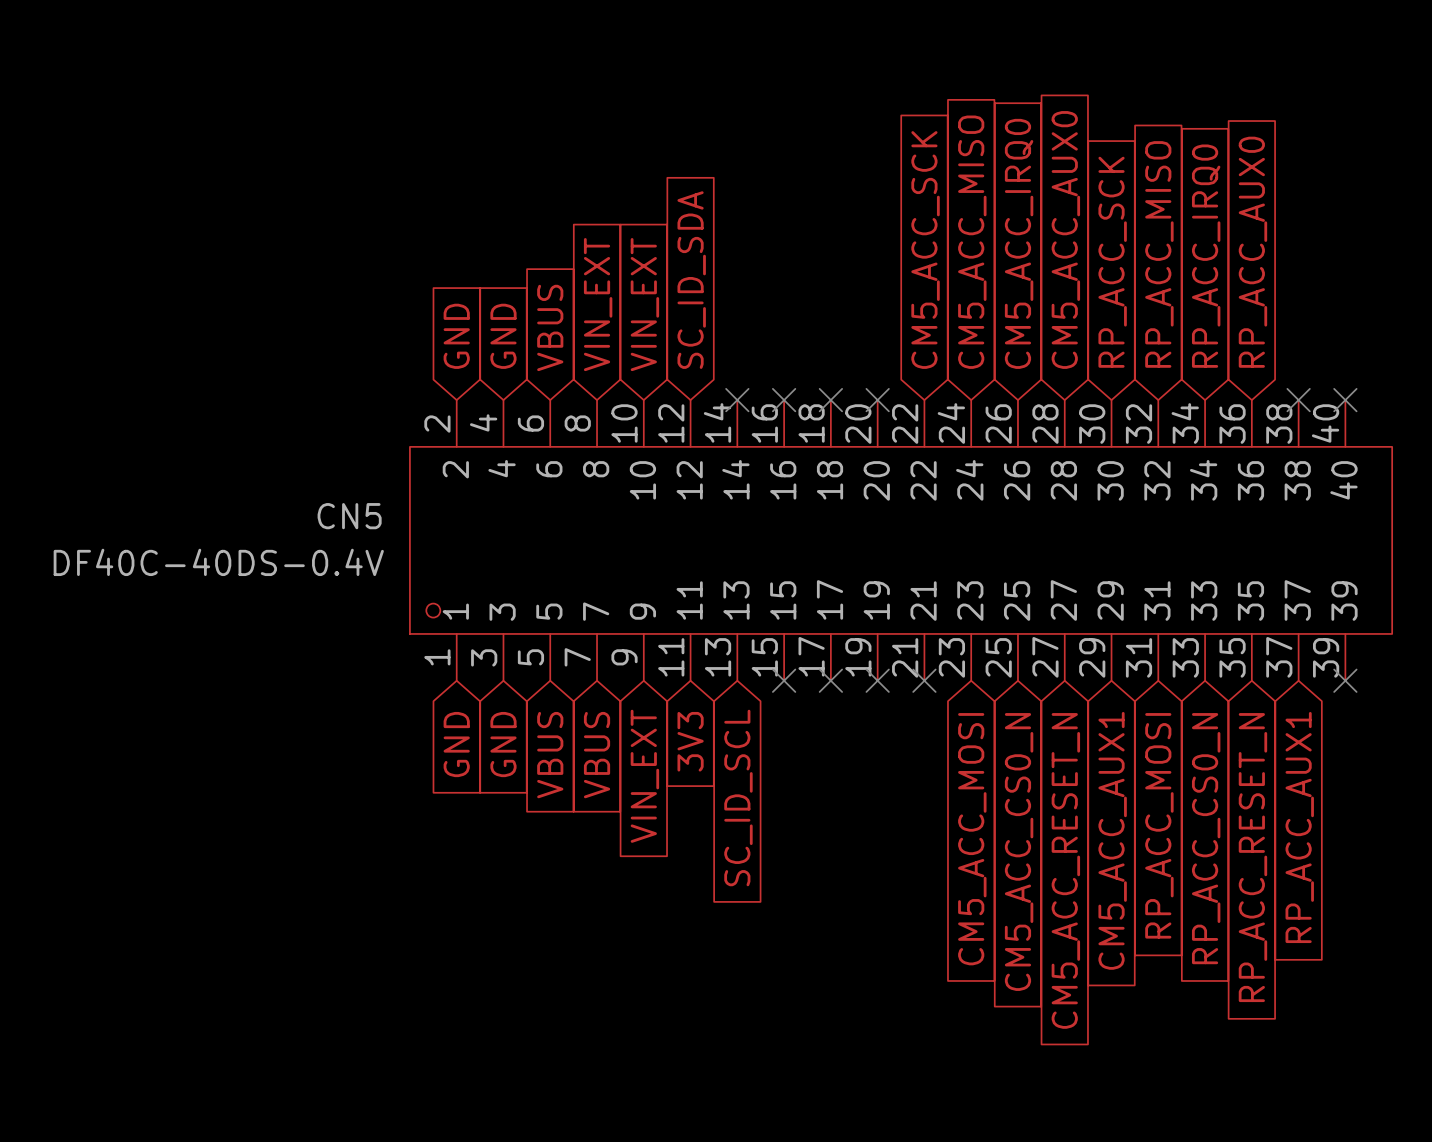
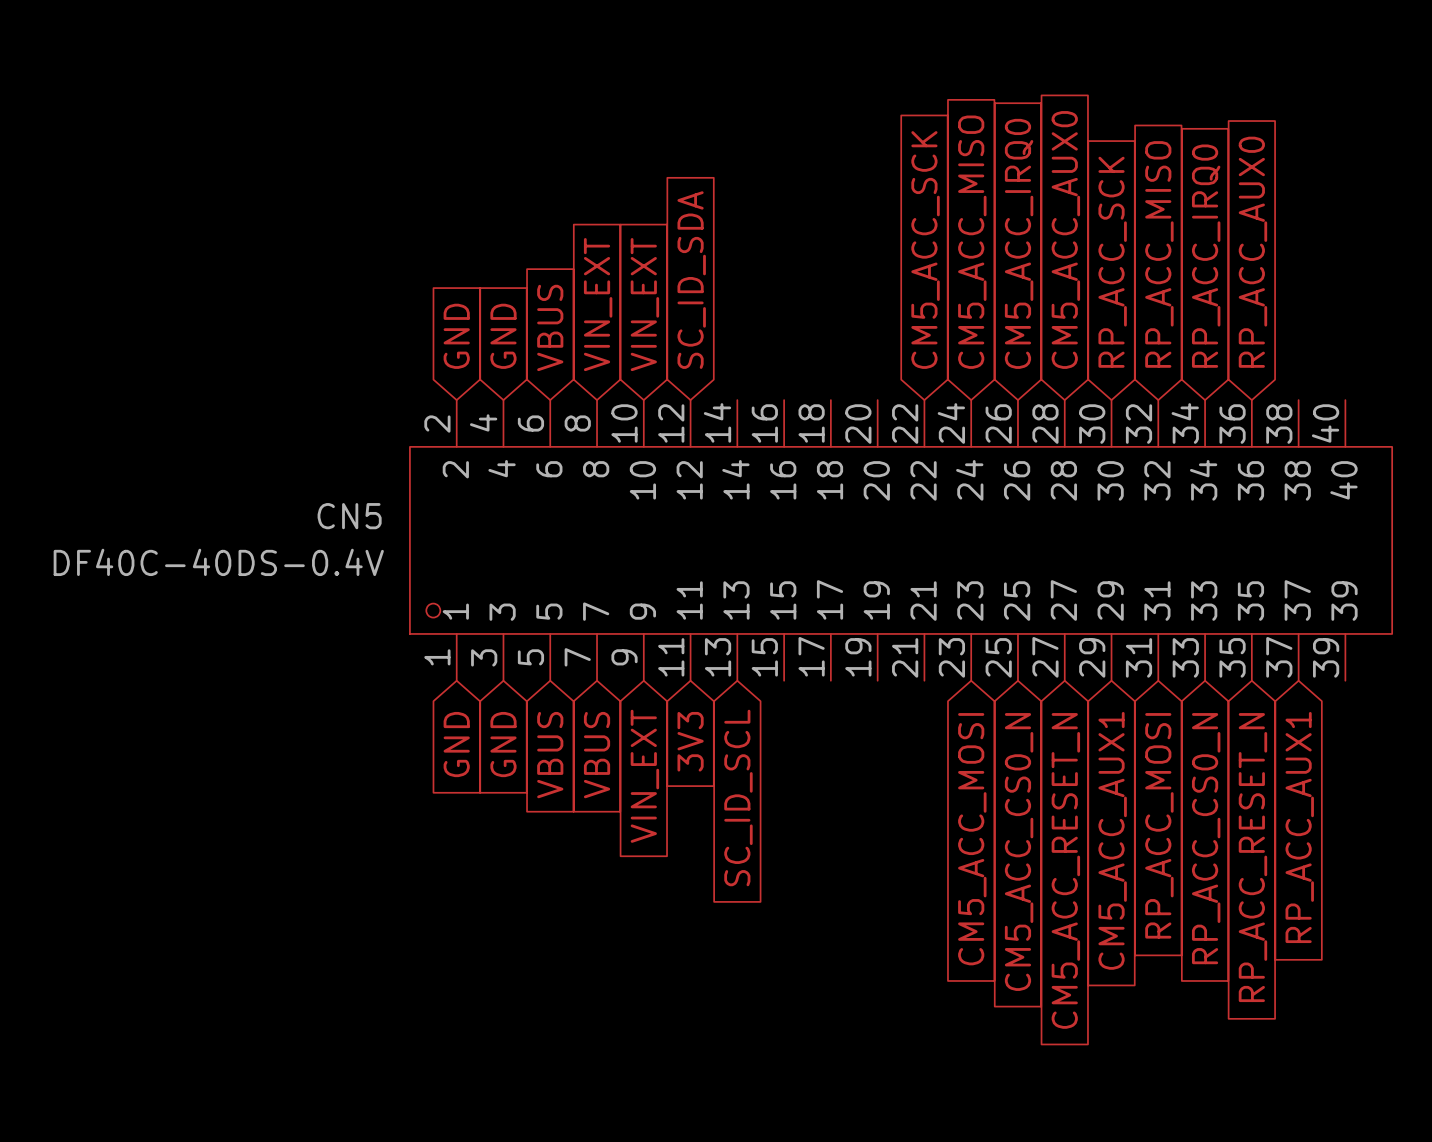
no-connect mark: (737, 400) -> none
no-connect mark: (784, 400) -> none
no-connect mark: (830, 400) -> none
no-connect mark: (877, 400) -> none
no-connect mark: (1298, 400) -> none
no-connect mark: (1345, 400) -> none
no-connect mark: (784, 680) -> none
no-connect mark: (830, 680) -> none
no-connect mark: (877, 680) -> none
no-connect mark: (924, 680) -> none
no-connect mark: (1345, 680) -> none

